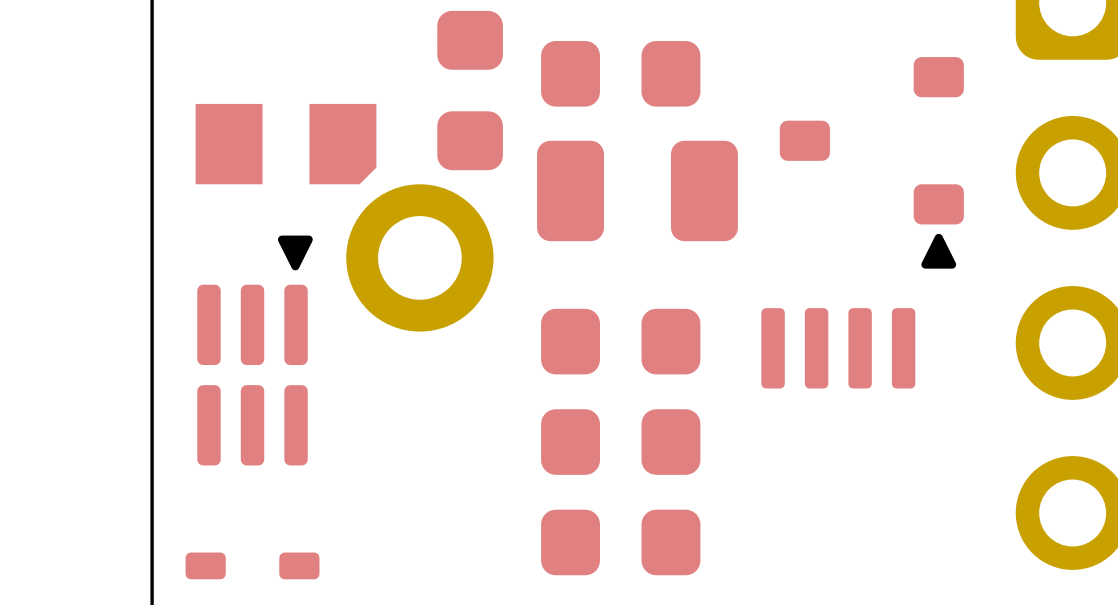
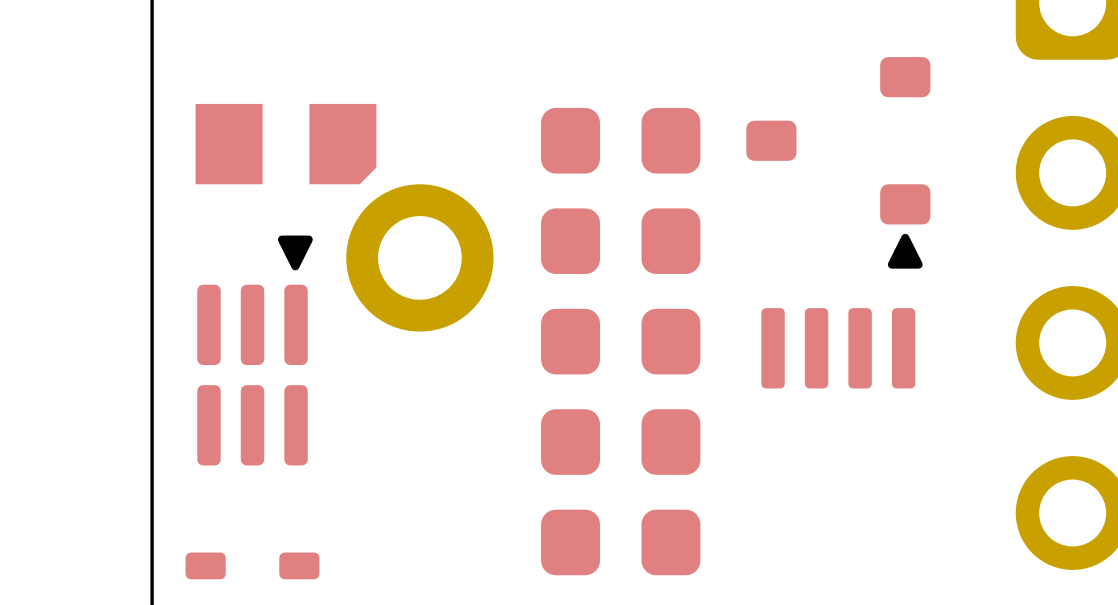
part position: (620, 73) -> (620, 140)
part: (470, 90) -> none
part position: (871, 162) -> (838, 162)
part: (637, 190) -> none
part: none -> (620, 241)

